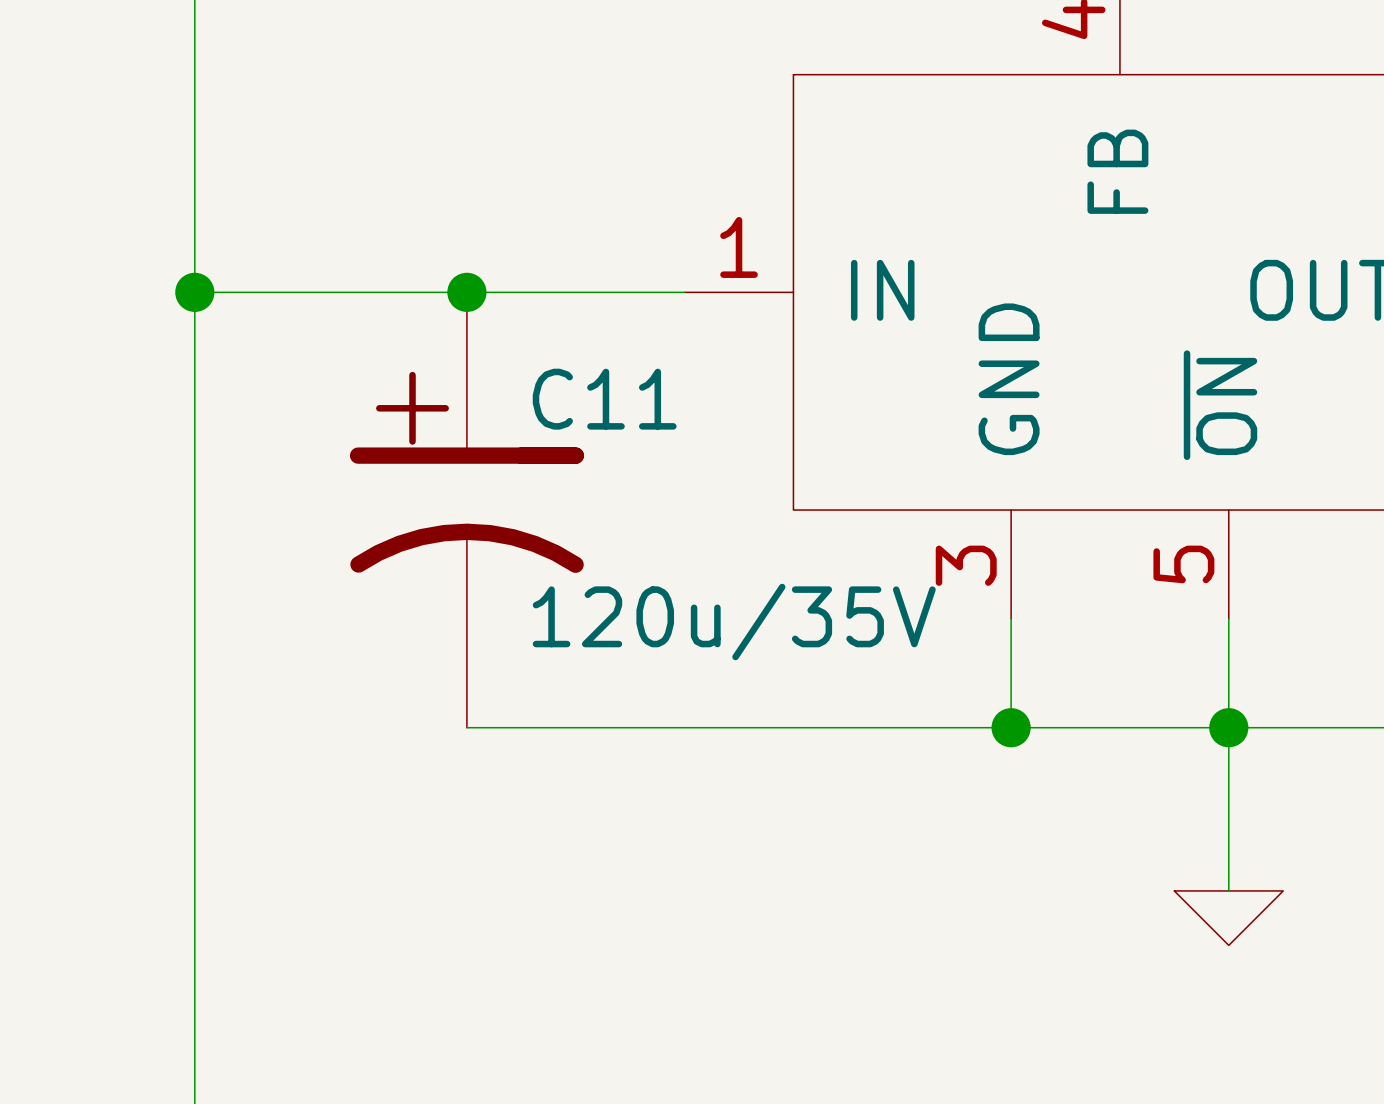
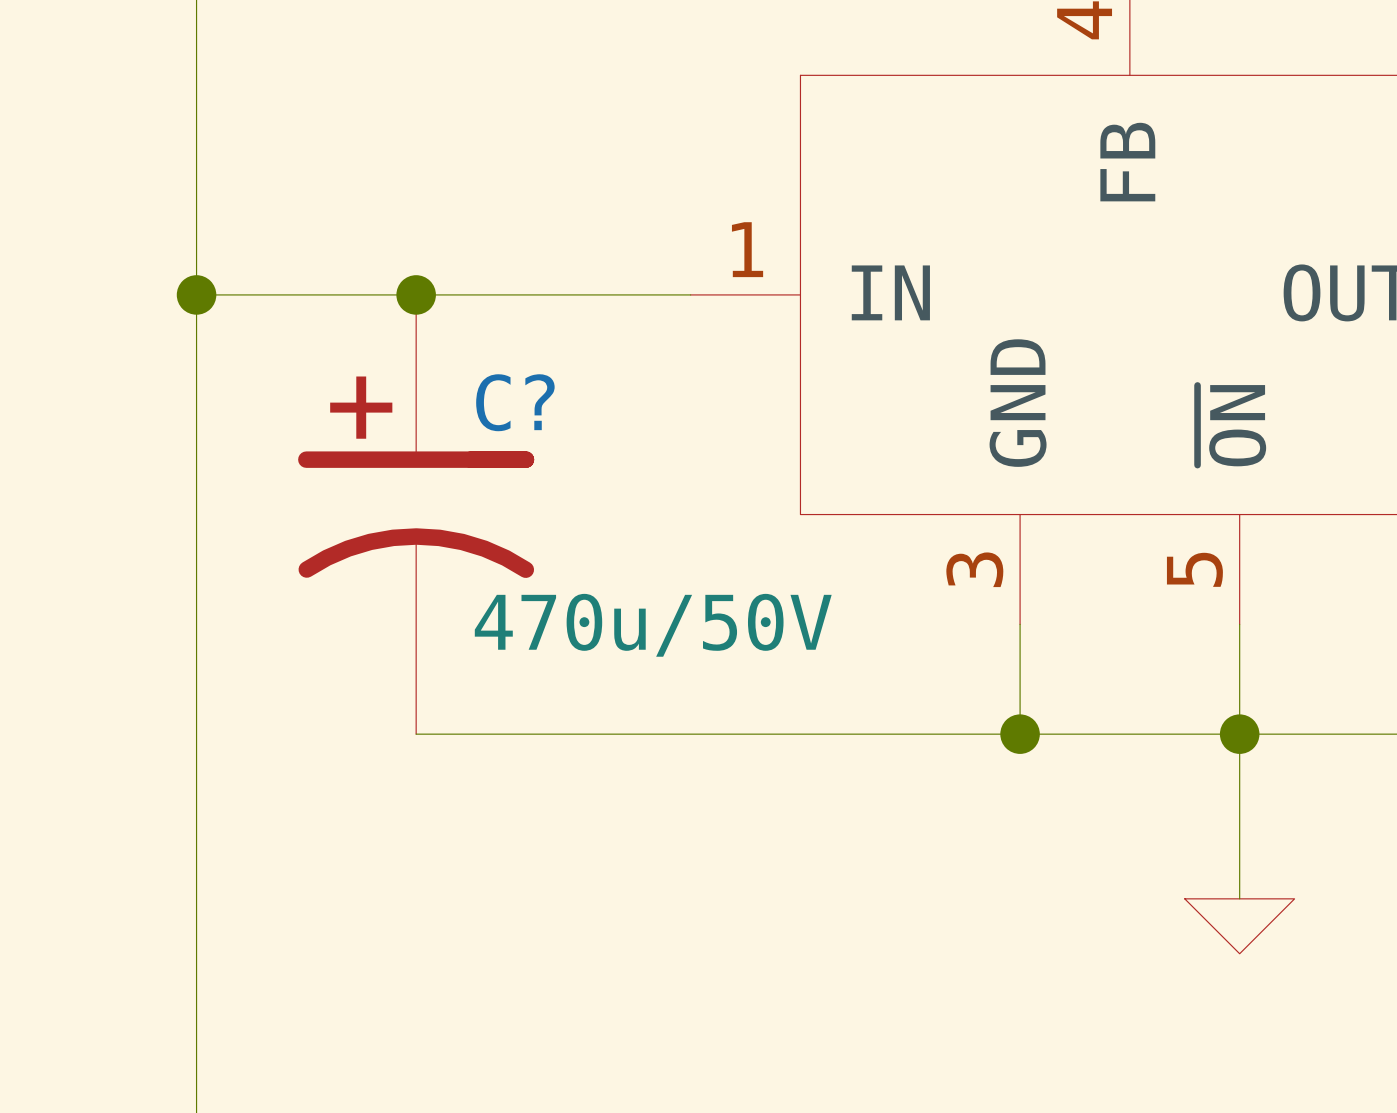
junction position: (466, 292) -> (416, 294)
C?: none -> 470u/50V (416, 514)
C11: 120u/35V (466, 510) -> none
wire: none -> (416, 734) (471, 734)

